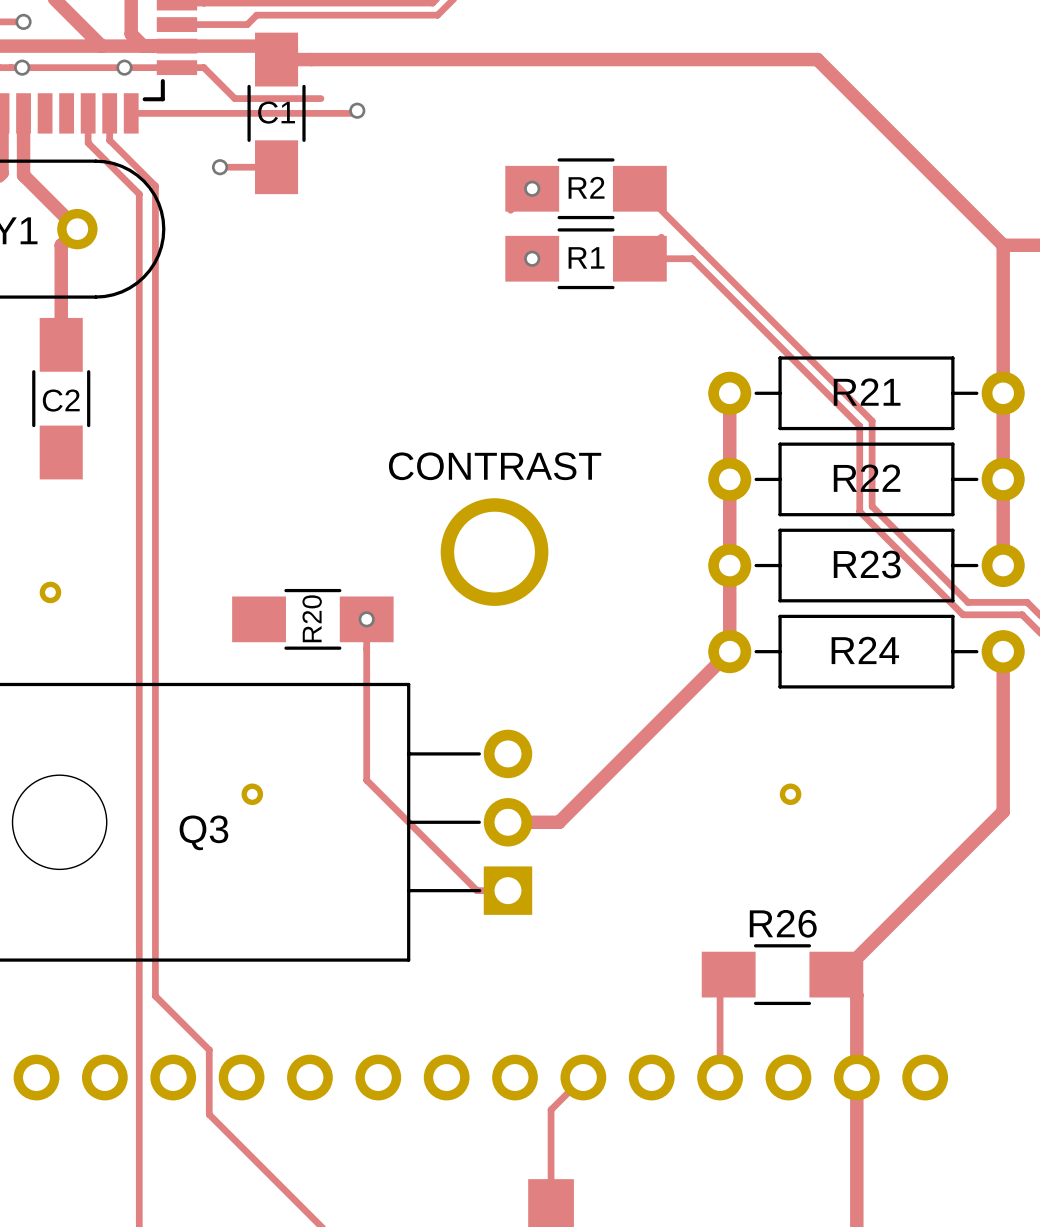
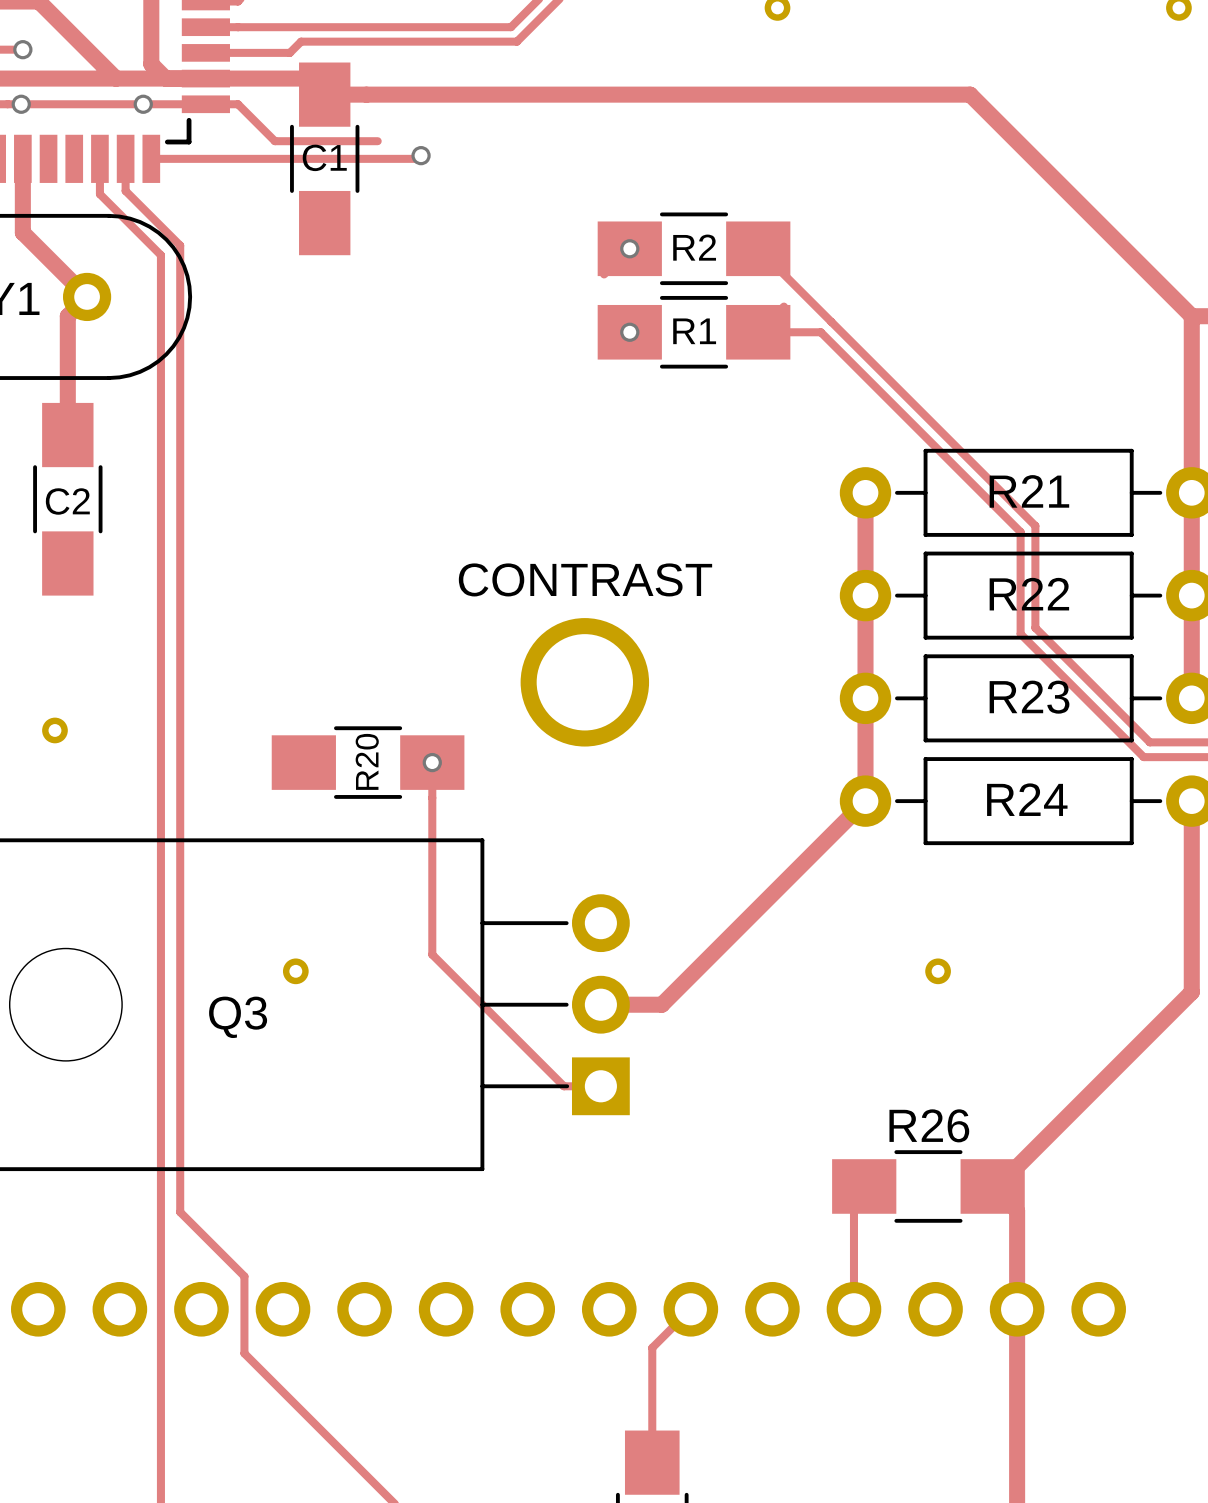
track: (220, 167) (276, 167) -> none
via: (220, 167) -> none

